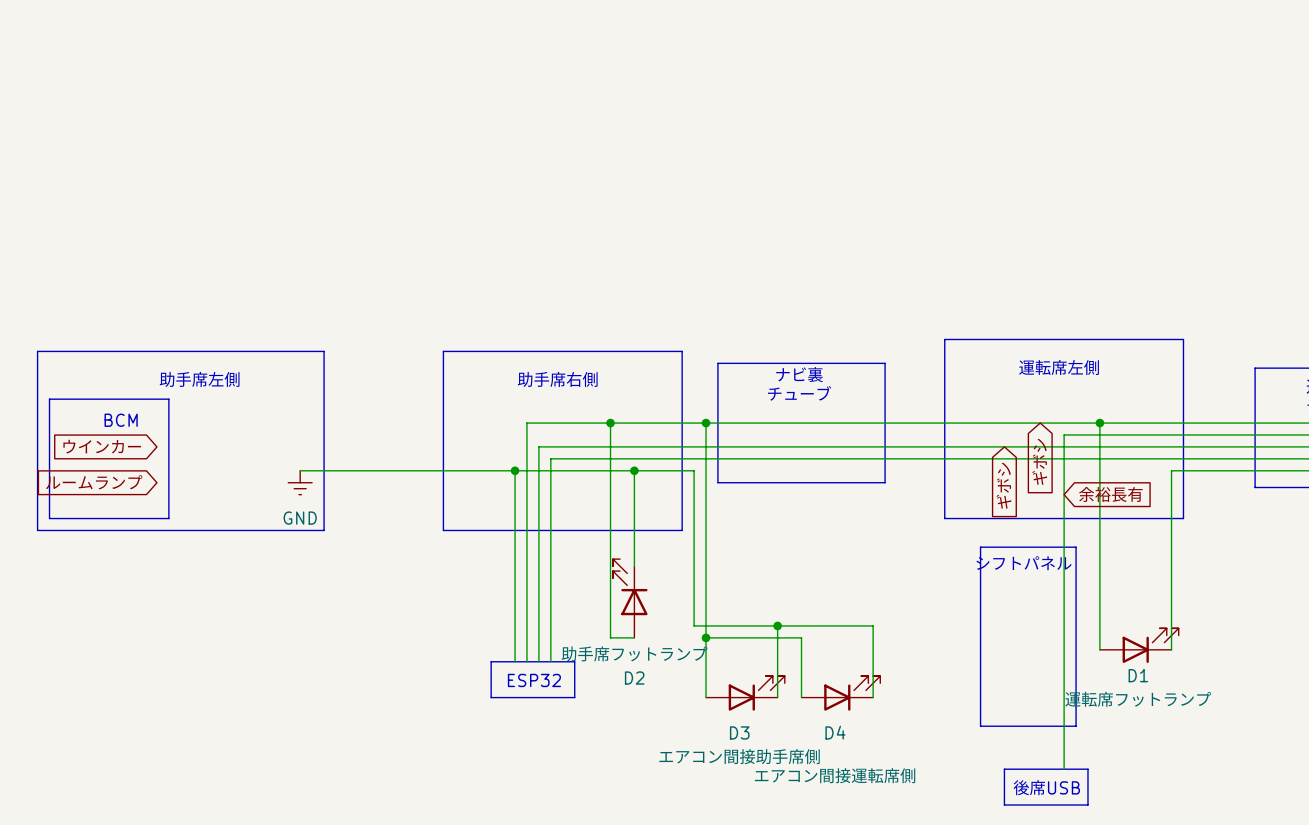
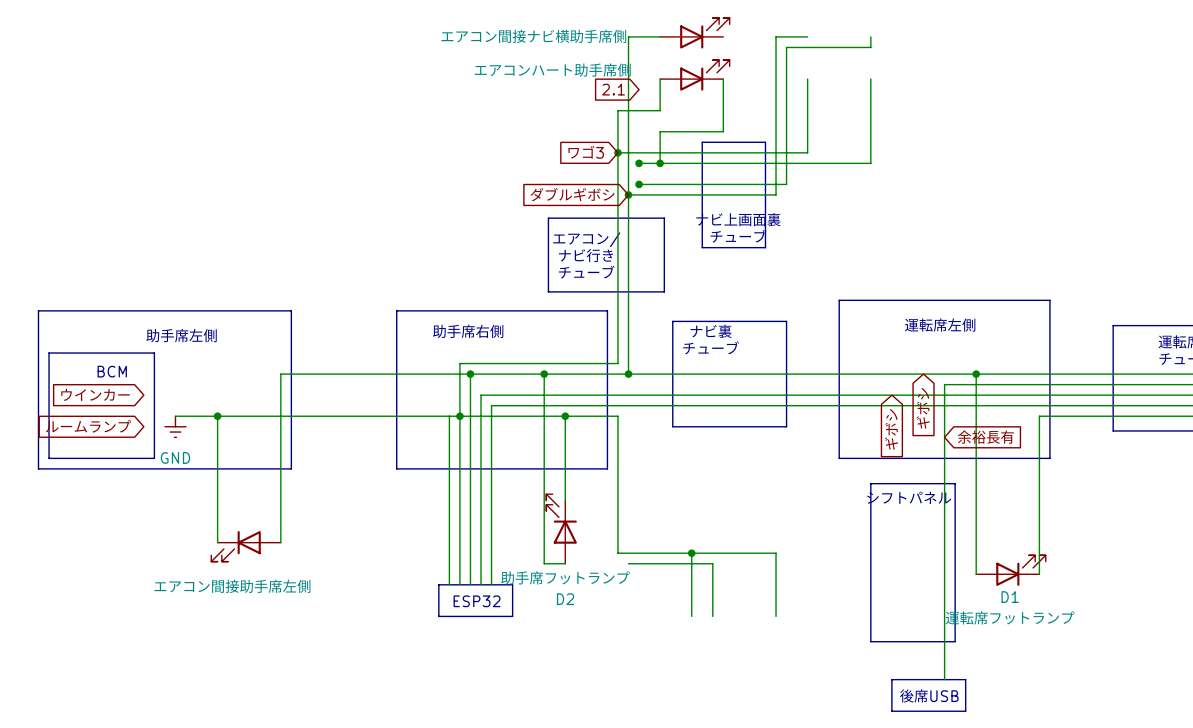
part: none -> エアコン間接ナビ横助手席側 (694, 33)
wire: none -> (807, 36) (776, 36) (776, 194) (628, 194)
wire: none -> (870, 36) (870, 47) (786, 47) (786, 184) (639, 184)
part: none -> エアコンハート助手席側 (694, 75)
wire: none -> (660, 79) (660, 110) (617, 110) (617, 363) (459, 363) (459, 416)
wire: none -> (723, 79) (723, 131) (660, 131) (660, 163)
wire: none -> (807, 79) (807, 152) (617, 152)
wire: none -> (870, 79) (870, 163) (639, 163)
global label: none -> 2.1 (613, 89)
line: none -> (702, 142) (765, 142) (765, 247) (702, 247) (702, 142)
global label: none -> ワゴ3 (585, 152)
junction: none -> (617, 152)
junction: none -> (639, 163)
junction: none -> (660, 163)
junction: none -> (639, 184)
global label: none -> ダブルギボシ (572, 194)
junction: none -> (628, 194)
line: none -> (548, 218) (664, 218) (664, 291) (548, 291) (548, 218)
text: none -> ナビ上画面裏 (738, 219)
text: none -> チューブ (738, 236)
text: none -> エアコン/ (586, 239)
text: none -> ナビ行き (586, 255)
text: none -> チューブ (586, 272)
line: (756, 363) (717, 363) (717, 482) (756, 482) -> (672, 321) (672, 426)
text position: 助手席右側 (557, 379) -> 助手席右側 (468, 331)
wire: none -> (470, 374) (280, 374) (280, 542)
junction: none -> (470, 374)
wire: (706, 423) (706, 697) -> (628, 374) (628, 36) (660, 36)
wire: none -> (175, 416) (270, 416)
wire: none -> (217, 416) (217, 542)
junction: none -> (217, 416)
wire: none -> (449, 416) (449, 584)
power symbol position: GND (300, 482) -> GND (175, 426)
part: none -> エアコン間接助手席左側 (246, 546)
junction: (706, 637) -> none
D3: エアコン間接助手席側 (745, 693) -> none
D4: エアコン間接運転席側 (840, 693) -> none

